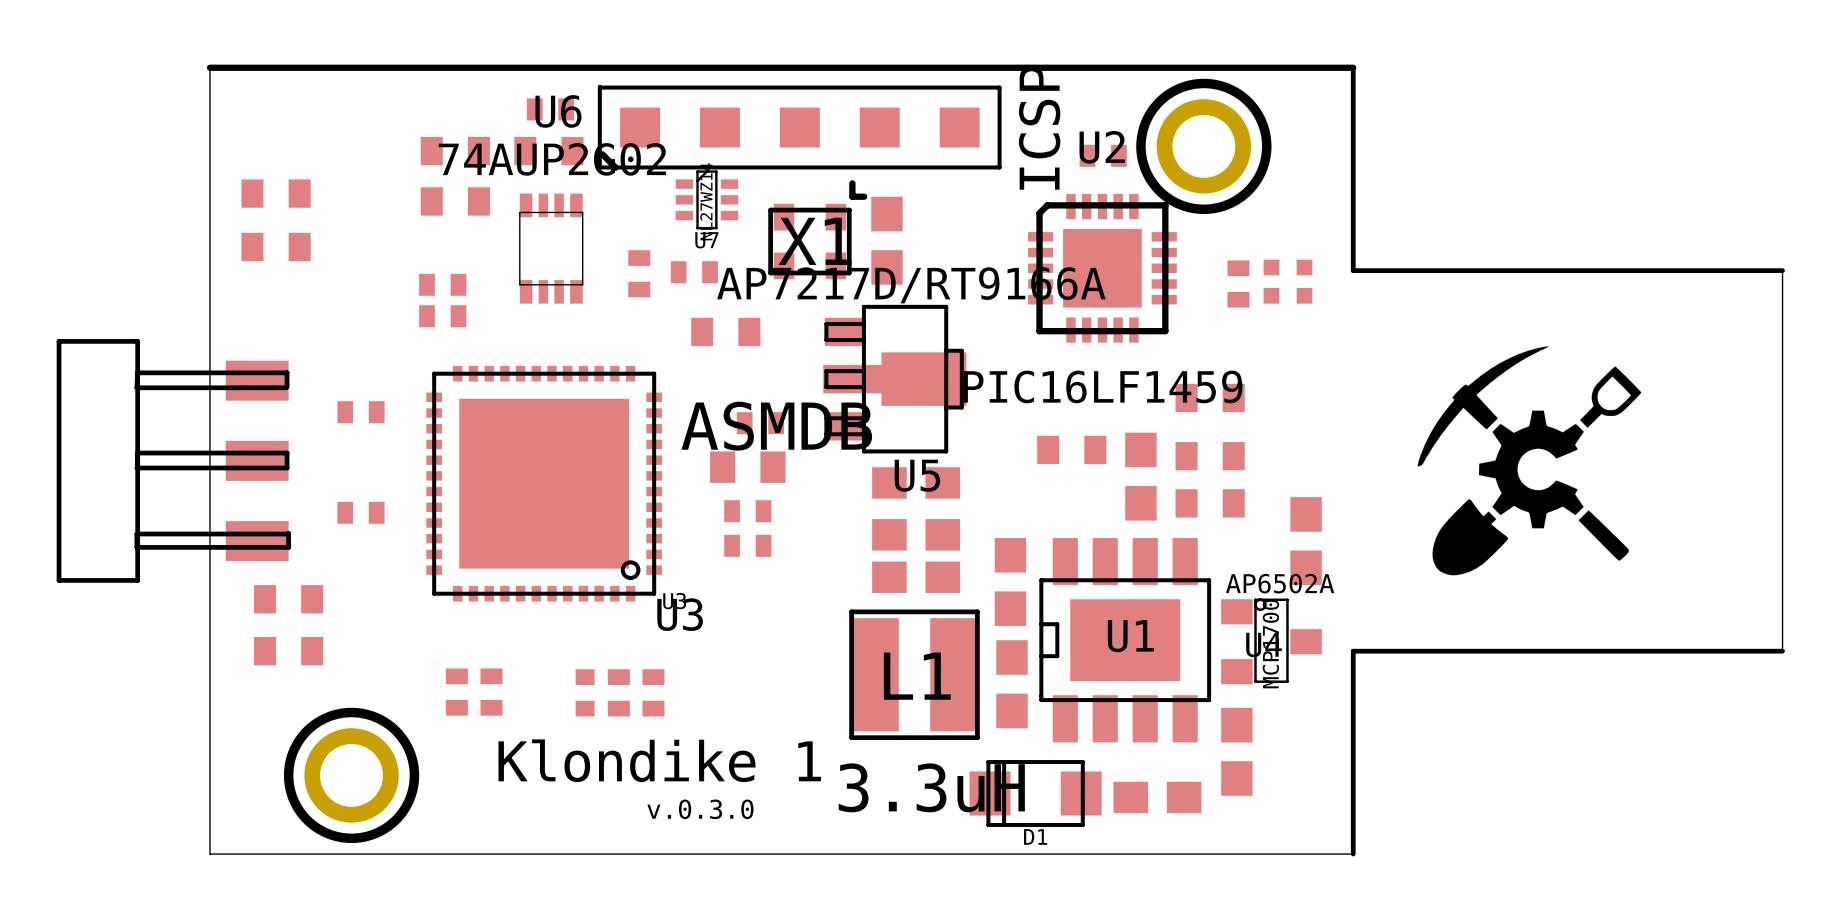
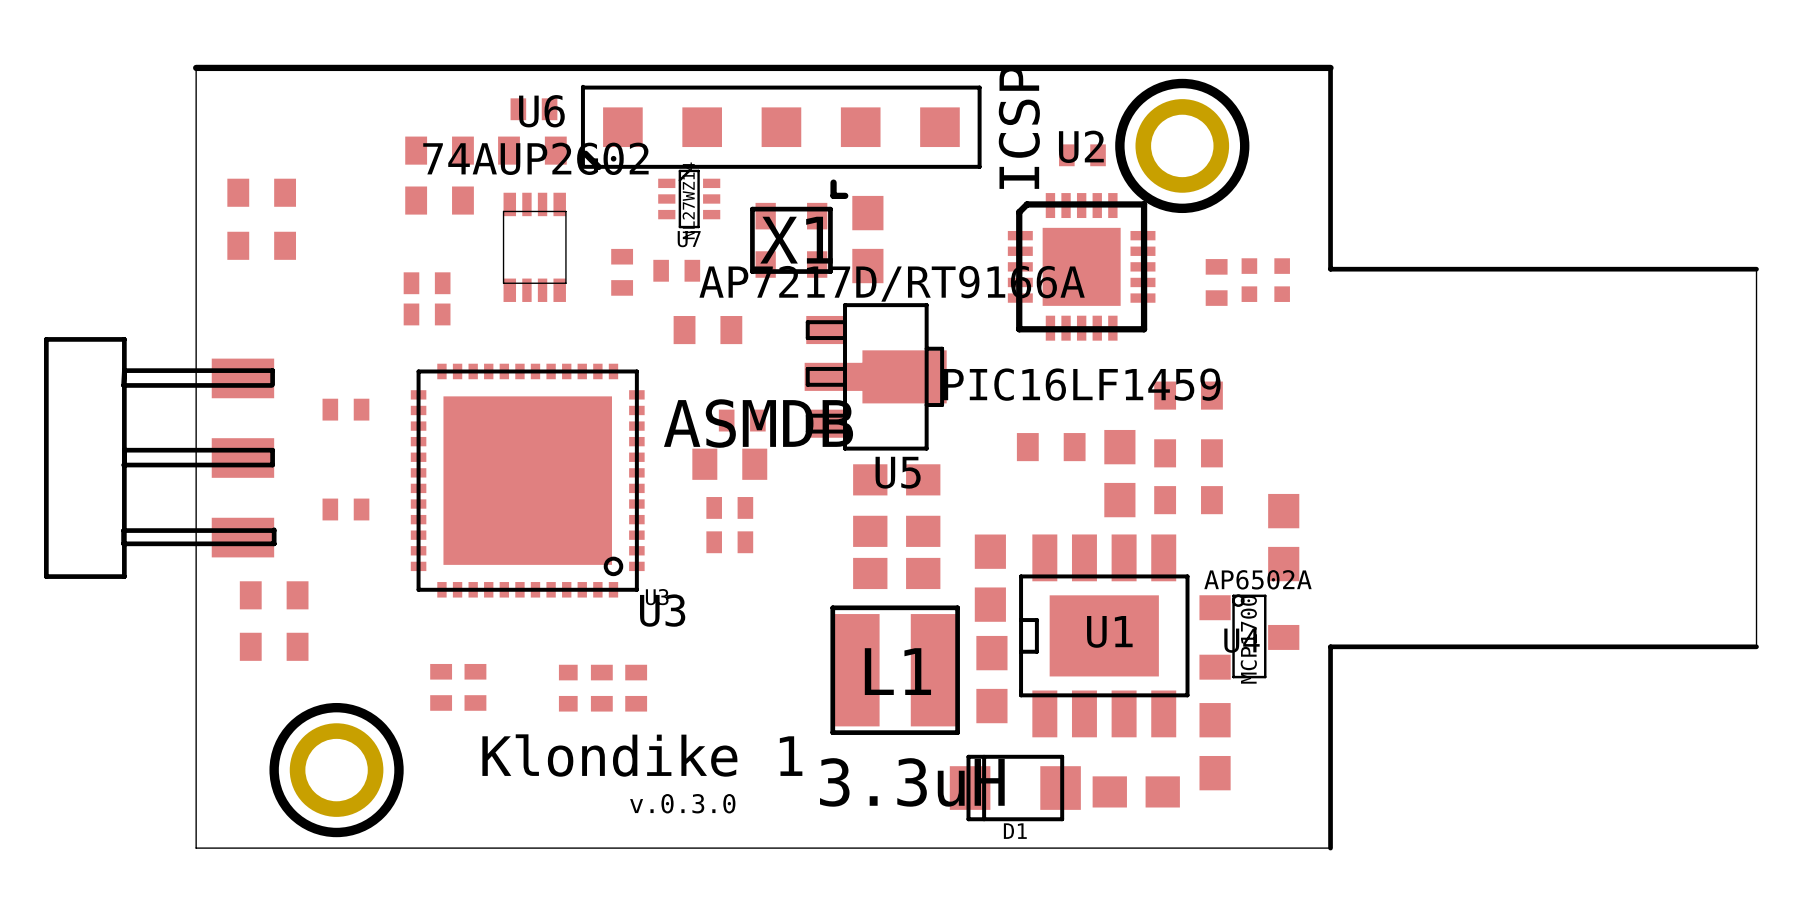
drawing: [1417, 346, 1642, 576] -> none

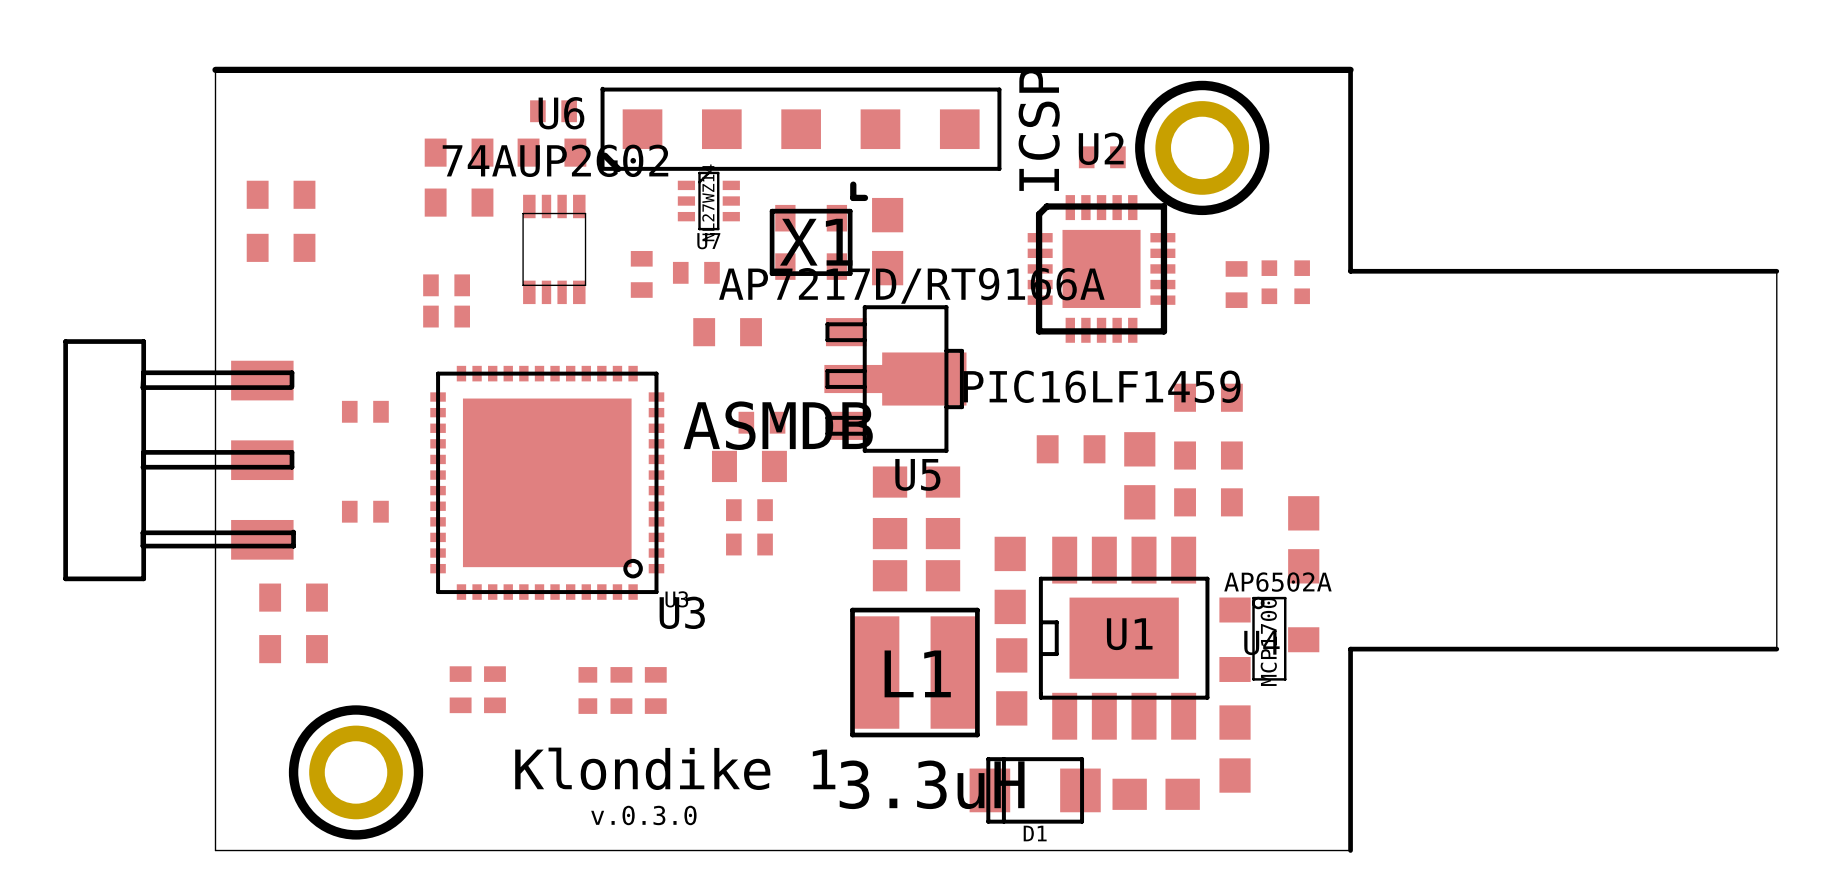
text position: Klondike 1 (642, 755) -> Klondike 1 (675, 768)
text position: v.0.3.0 (682, 803) -> v.0.3.0 (643, 815)

